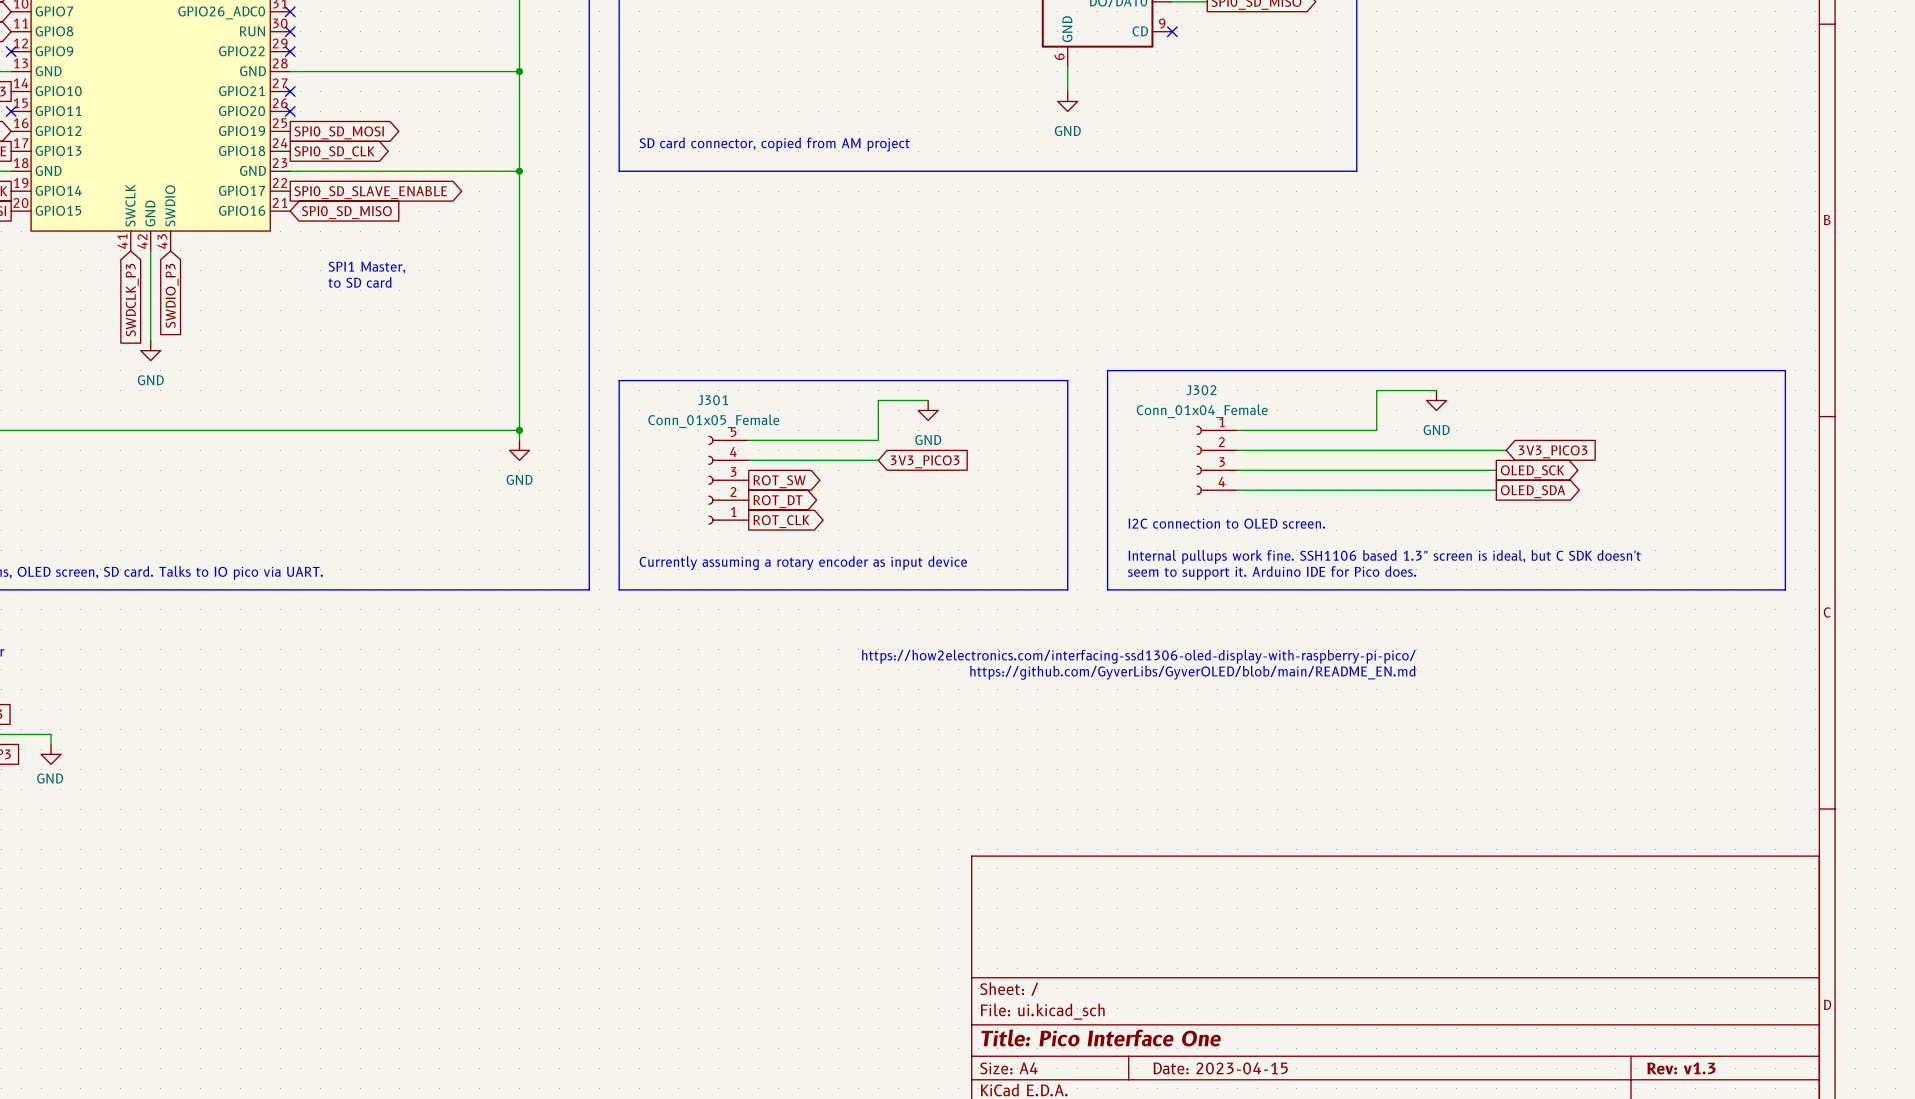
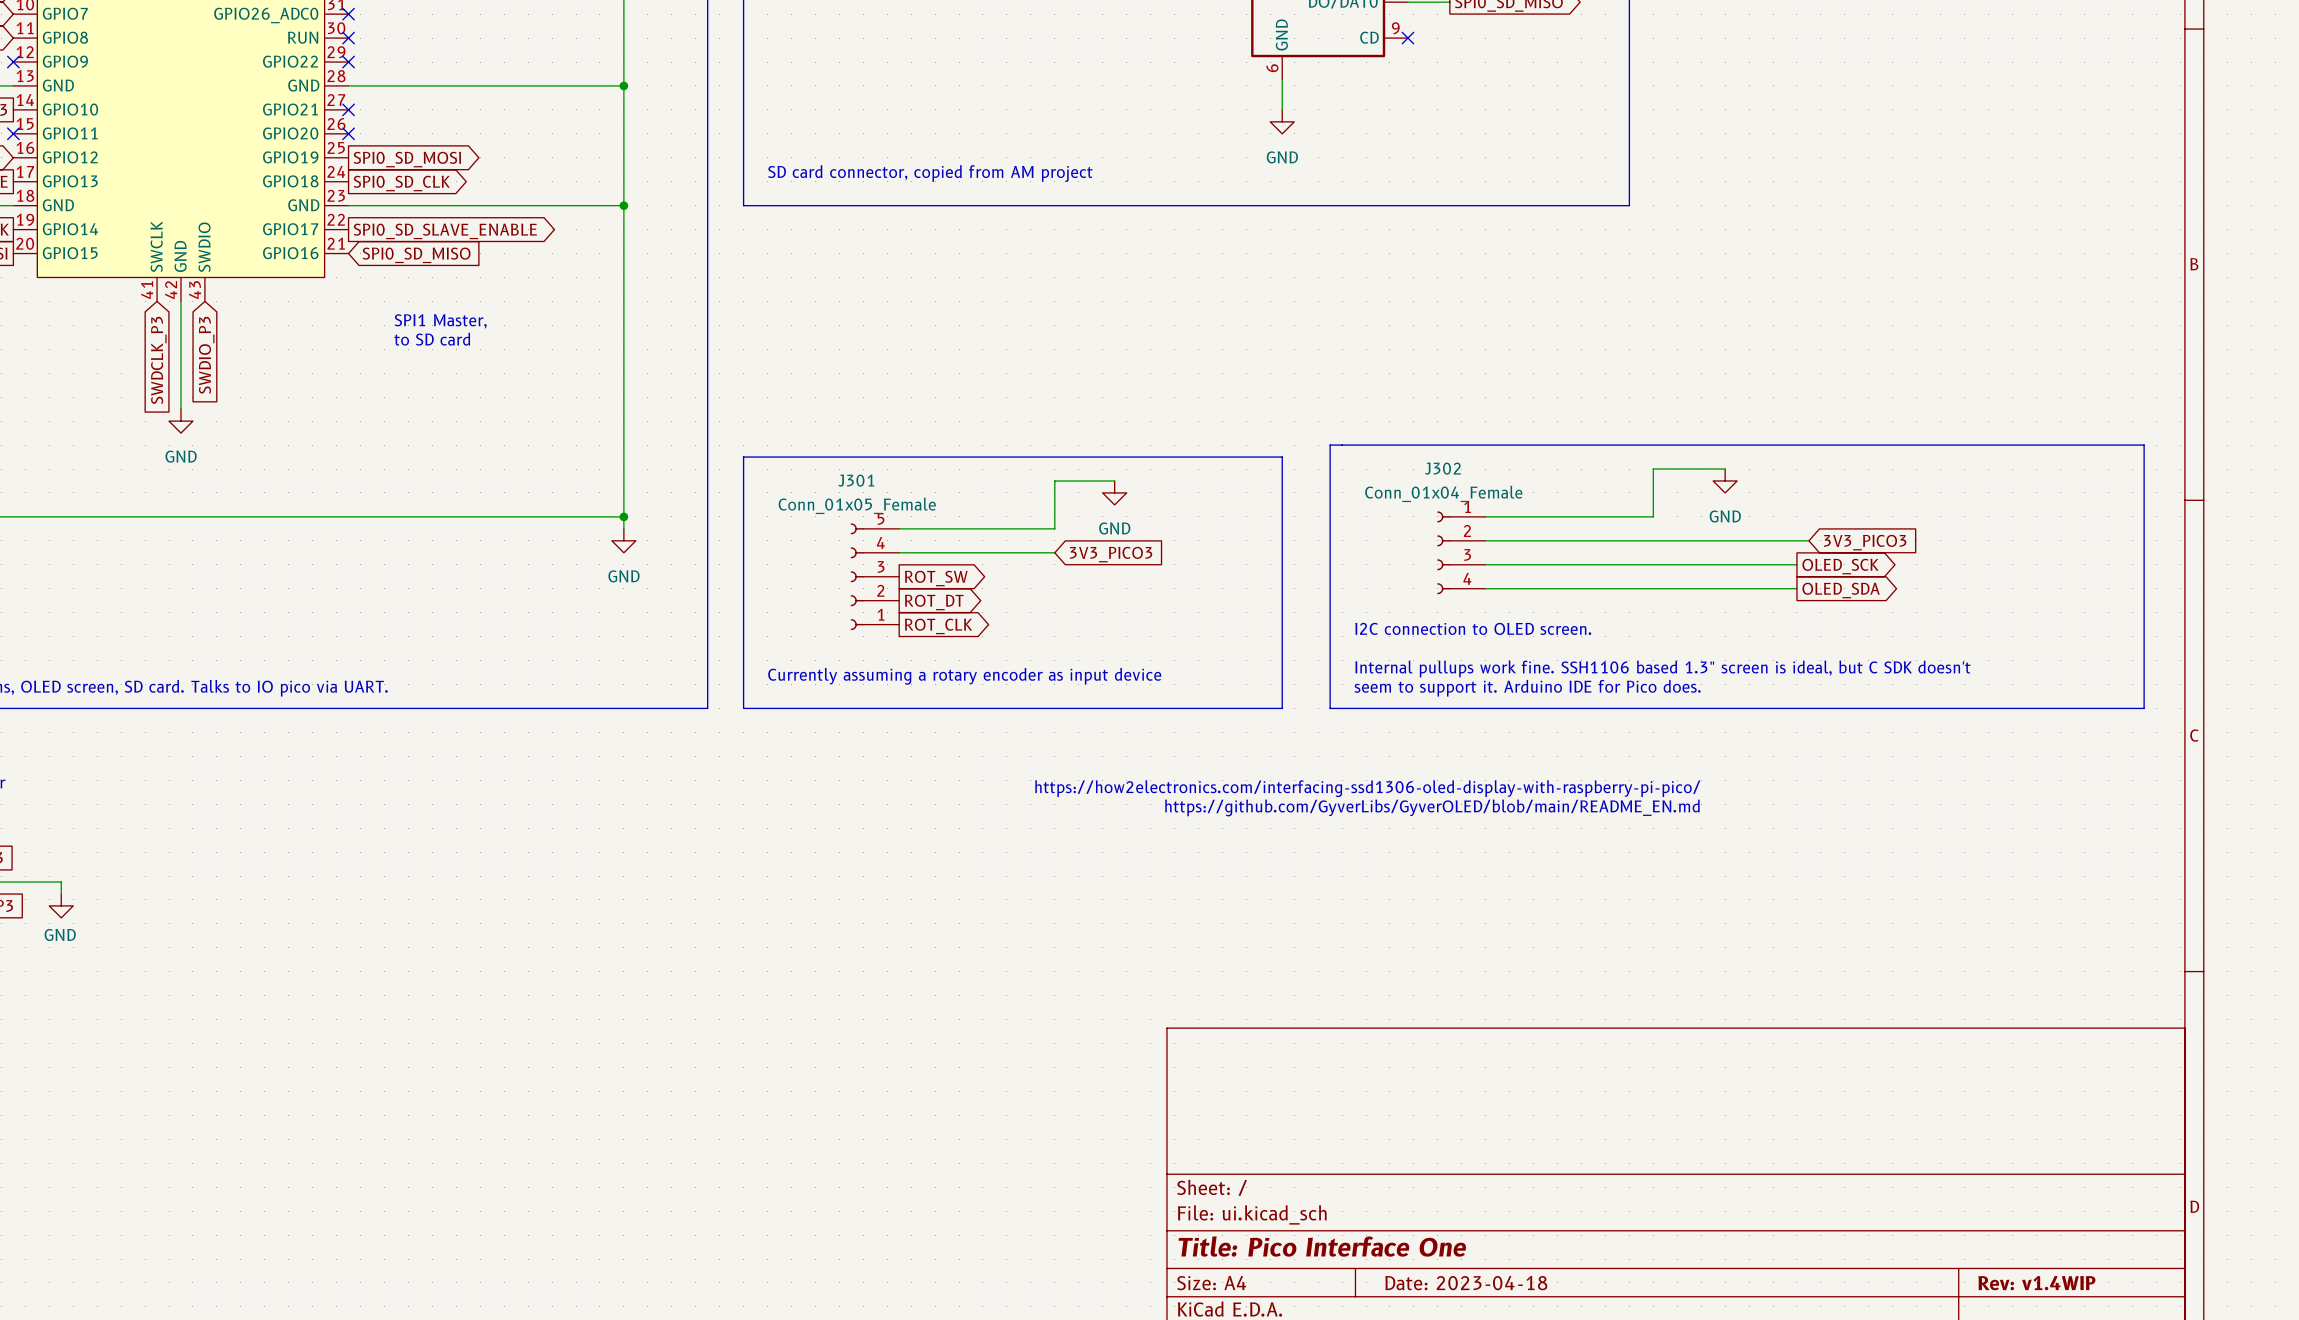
title block: Date: 2023-04-15 (1220, 1068) -> Date: 2023-04-18 (1466, 1283)
title block: Rev: v1.3 (1681, 1068) -> Rev: v1.4WIP (2036, 1283)

